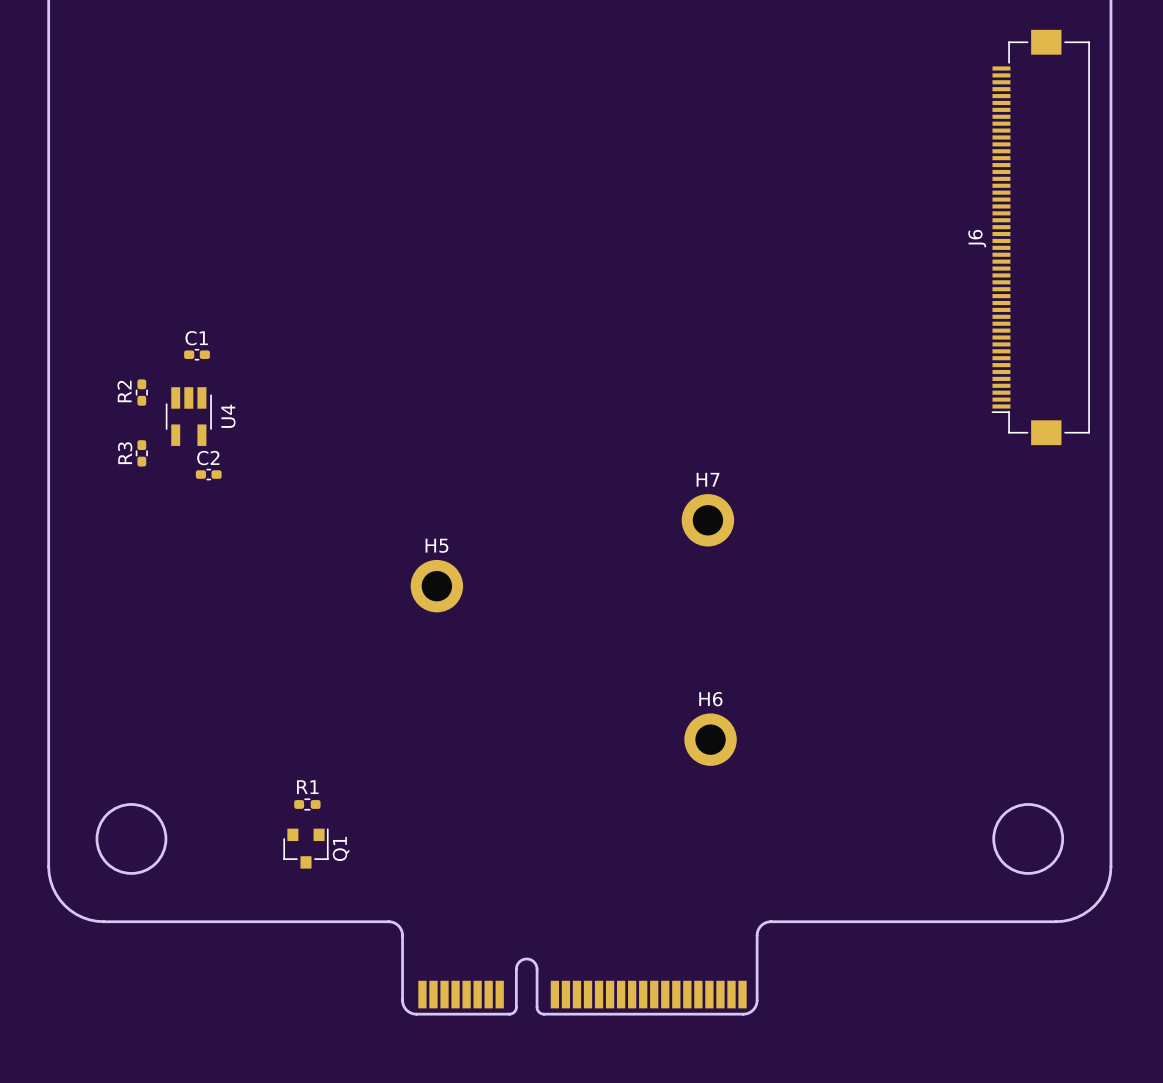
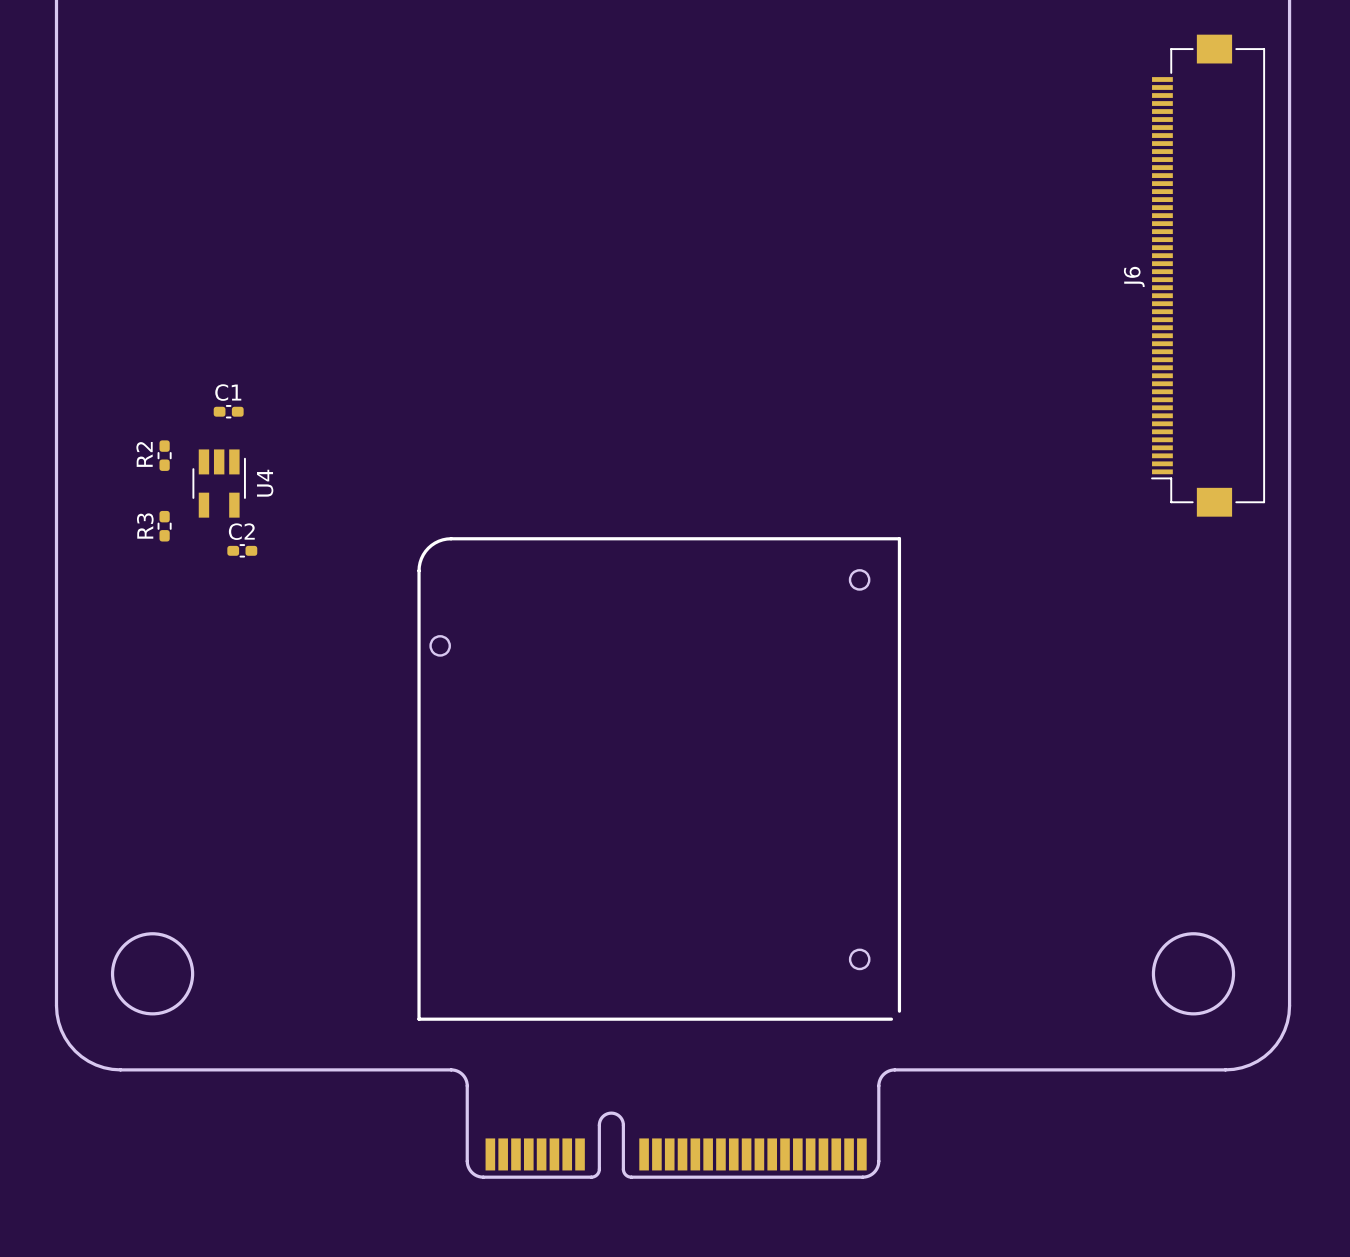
round board edge: none -> [848, 569, 871, 591]
H7: (707, 520) -> none
round board edge: none -> [429, 635, 451, 657]
H5: (436, 586) -> none
H6: (710, 739) -> none
R1: (307, 804) -> none
round board edge: none -> [848, 948, 871, 971]
Q1: (305, 848) -> none
line: none -> (899, 1011) (899, 538) (451, 538) (438, 541) (428, 548) (421, 558) (419, 570) (419, 1019) (891, 1019)

